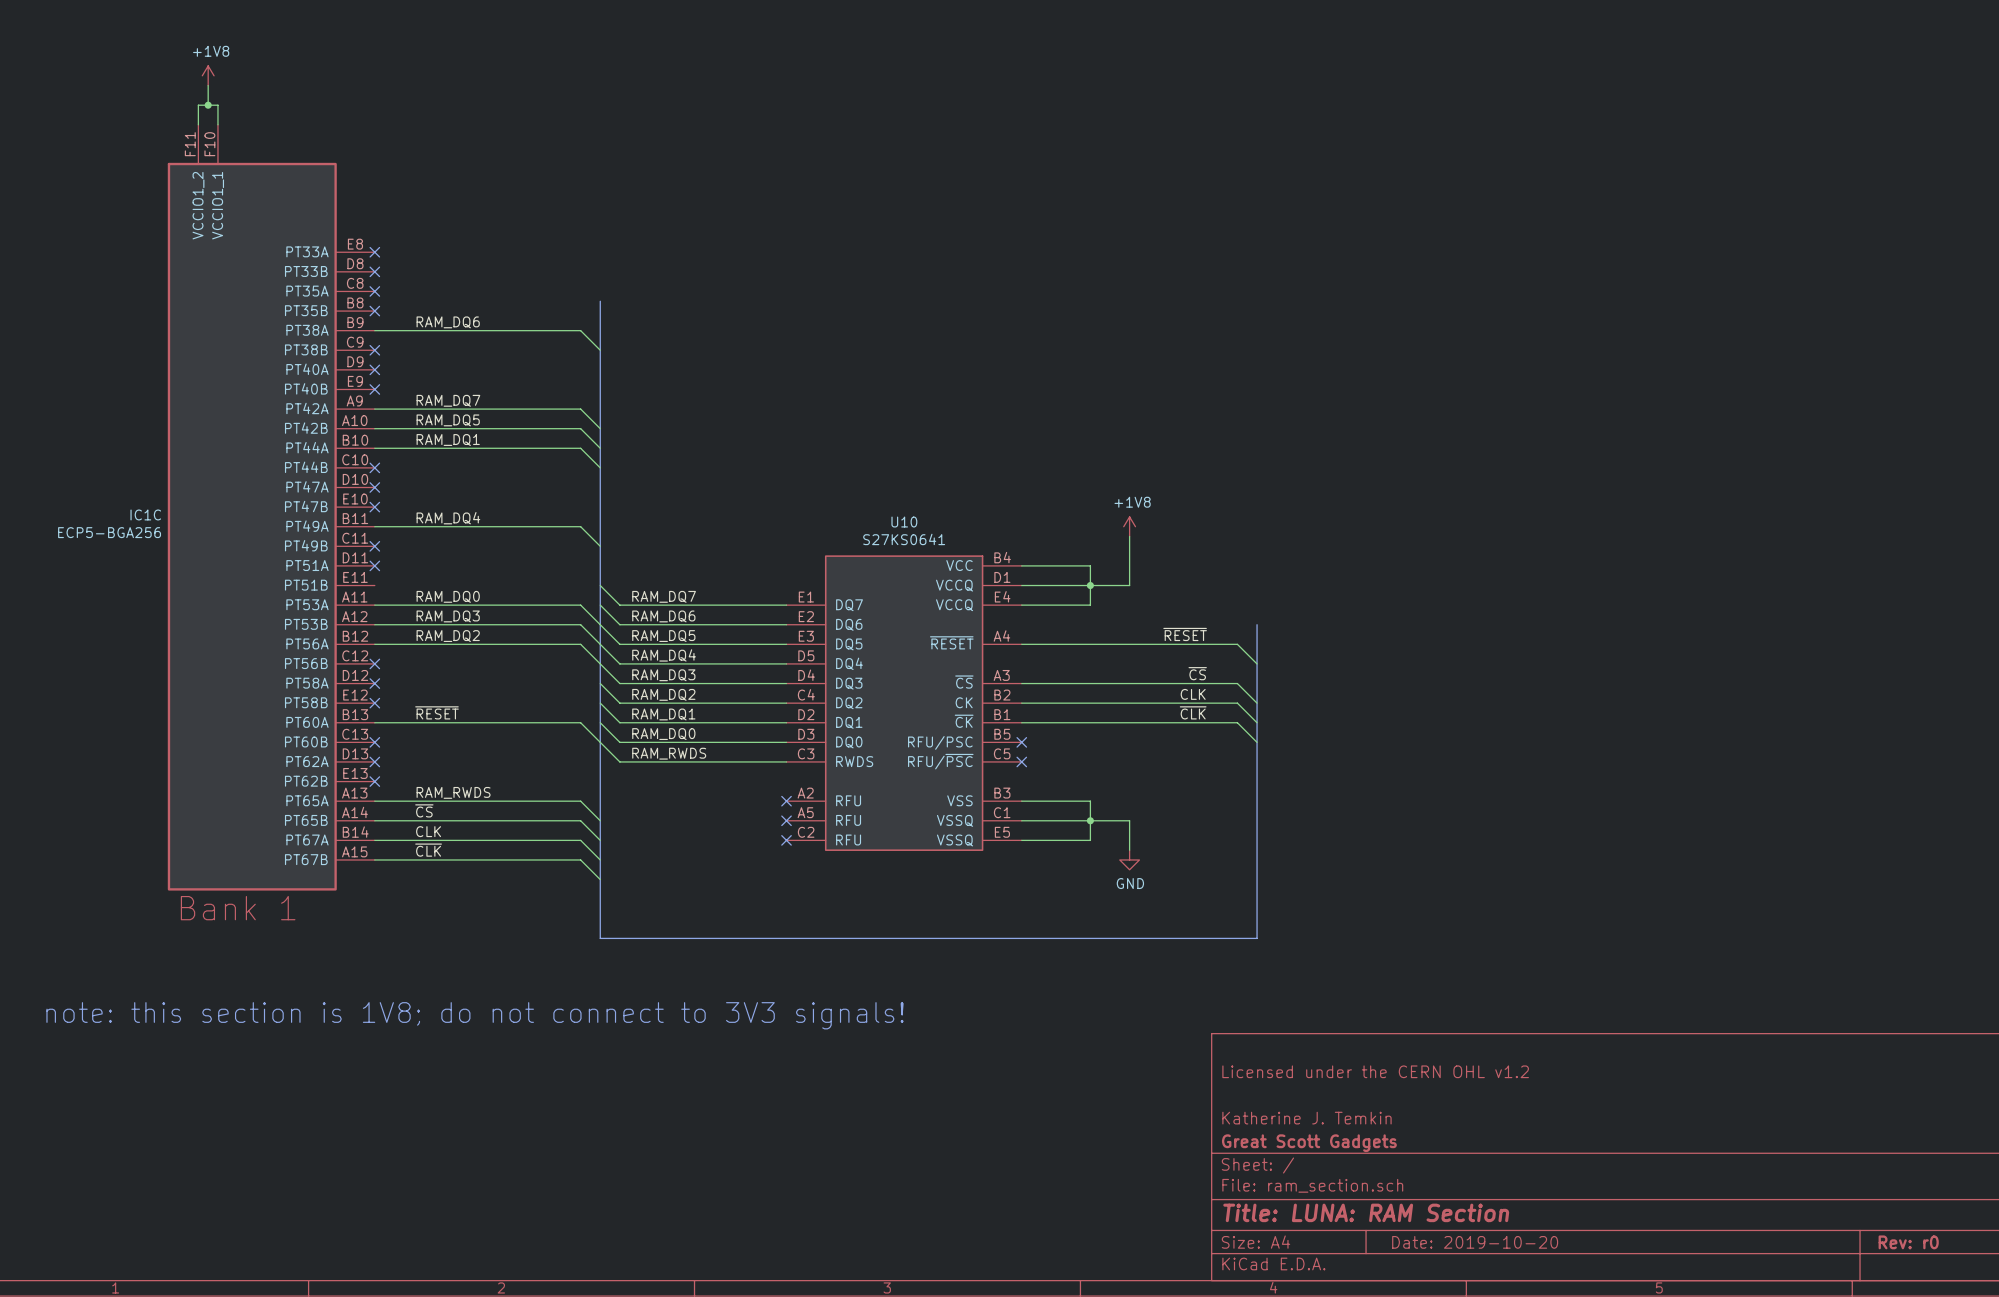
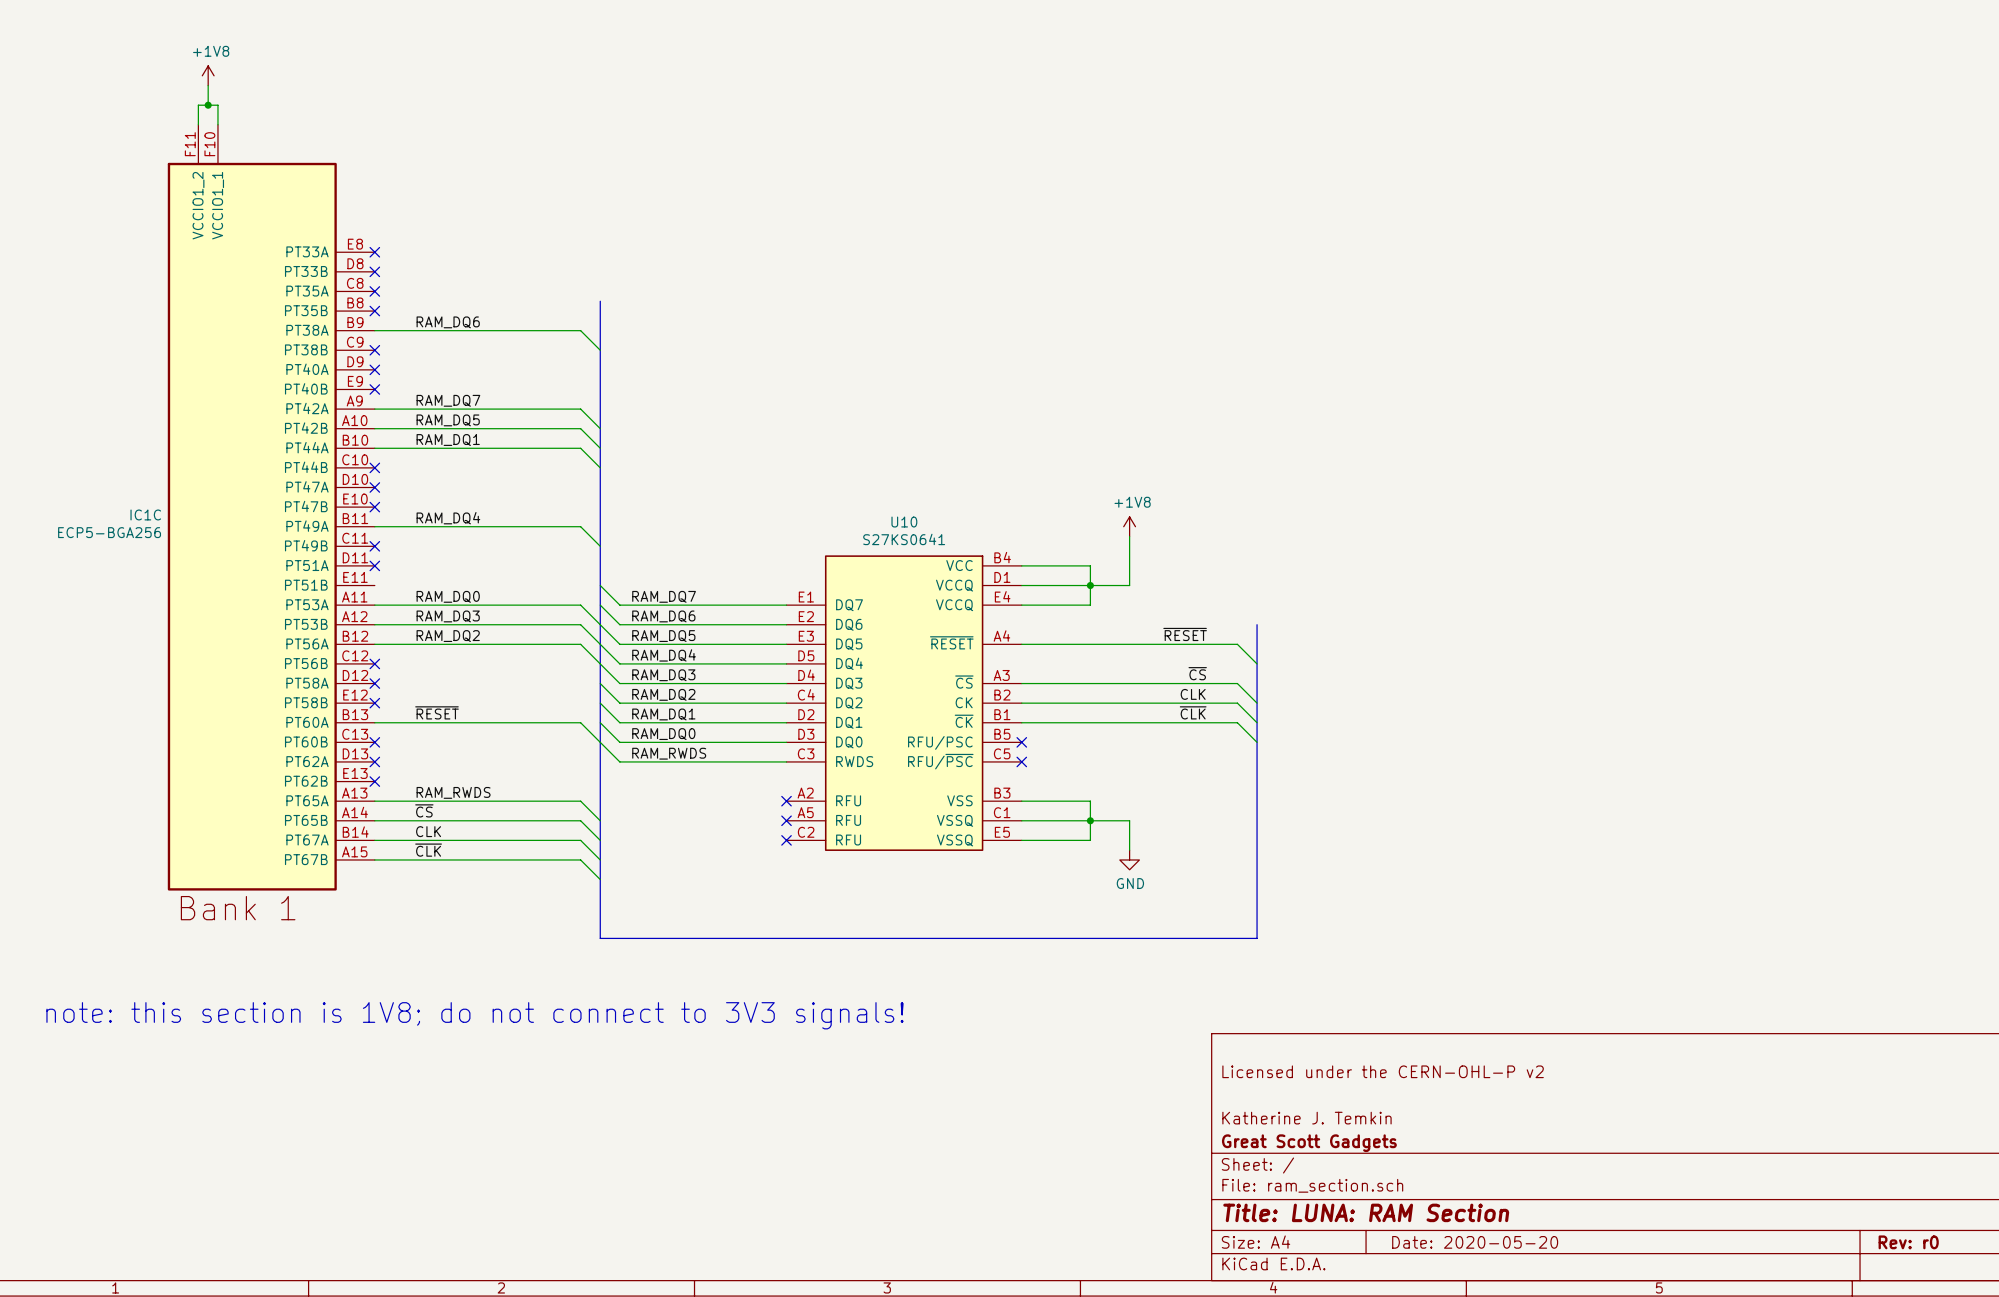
title block: Licensed under the CERN OHL v1.2 (1375, 1071) -> Licensed under the CERN-OHL-P v2 (1383, 1071)
title block: Date: 2019-10-20 (1475, 1242) -> Date: 2020-05-20 (1475, 1242)

